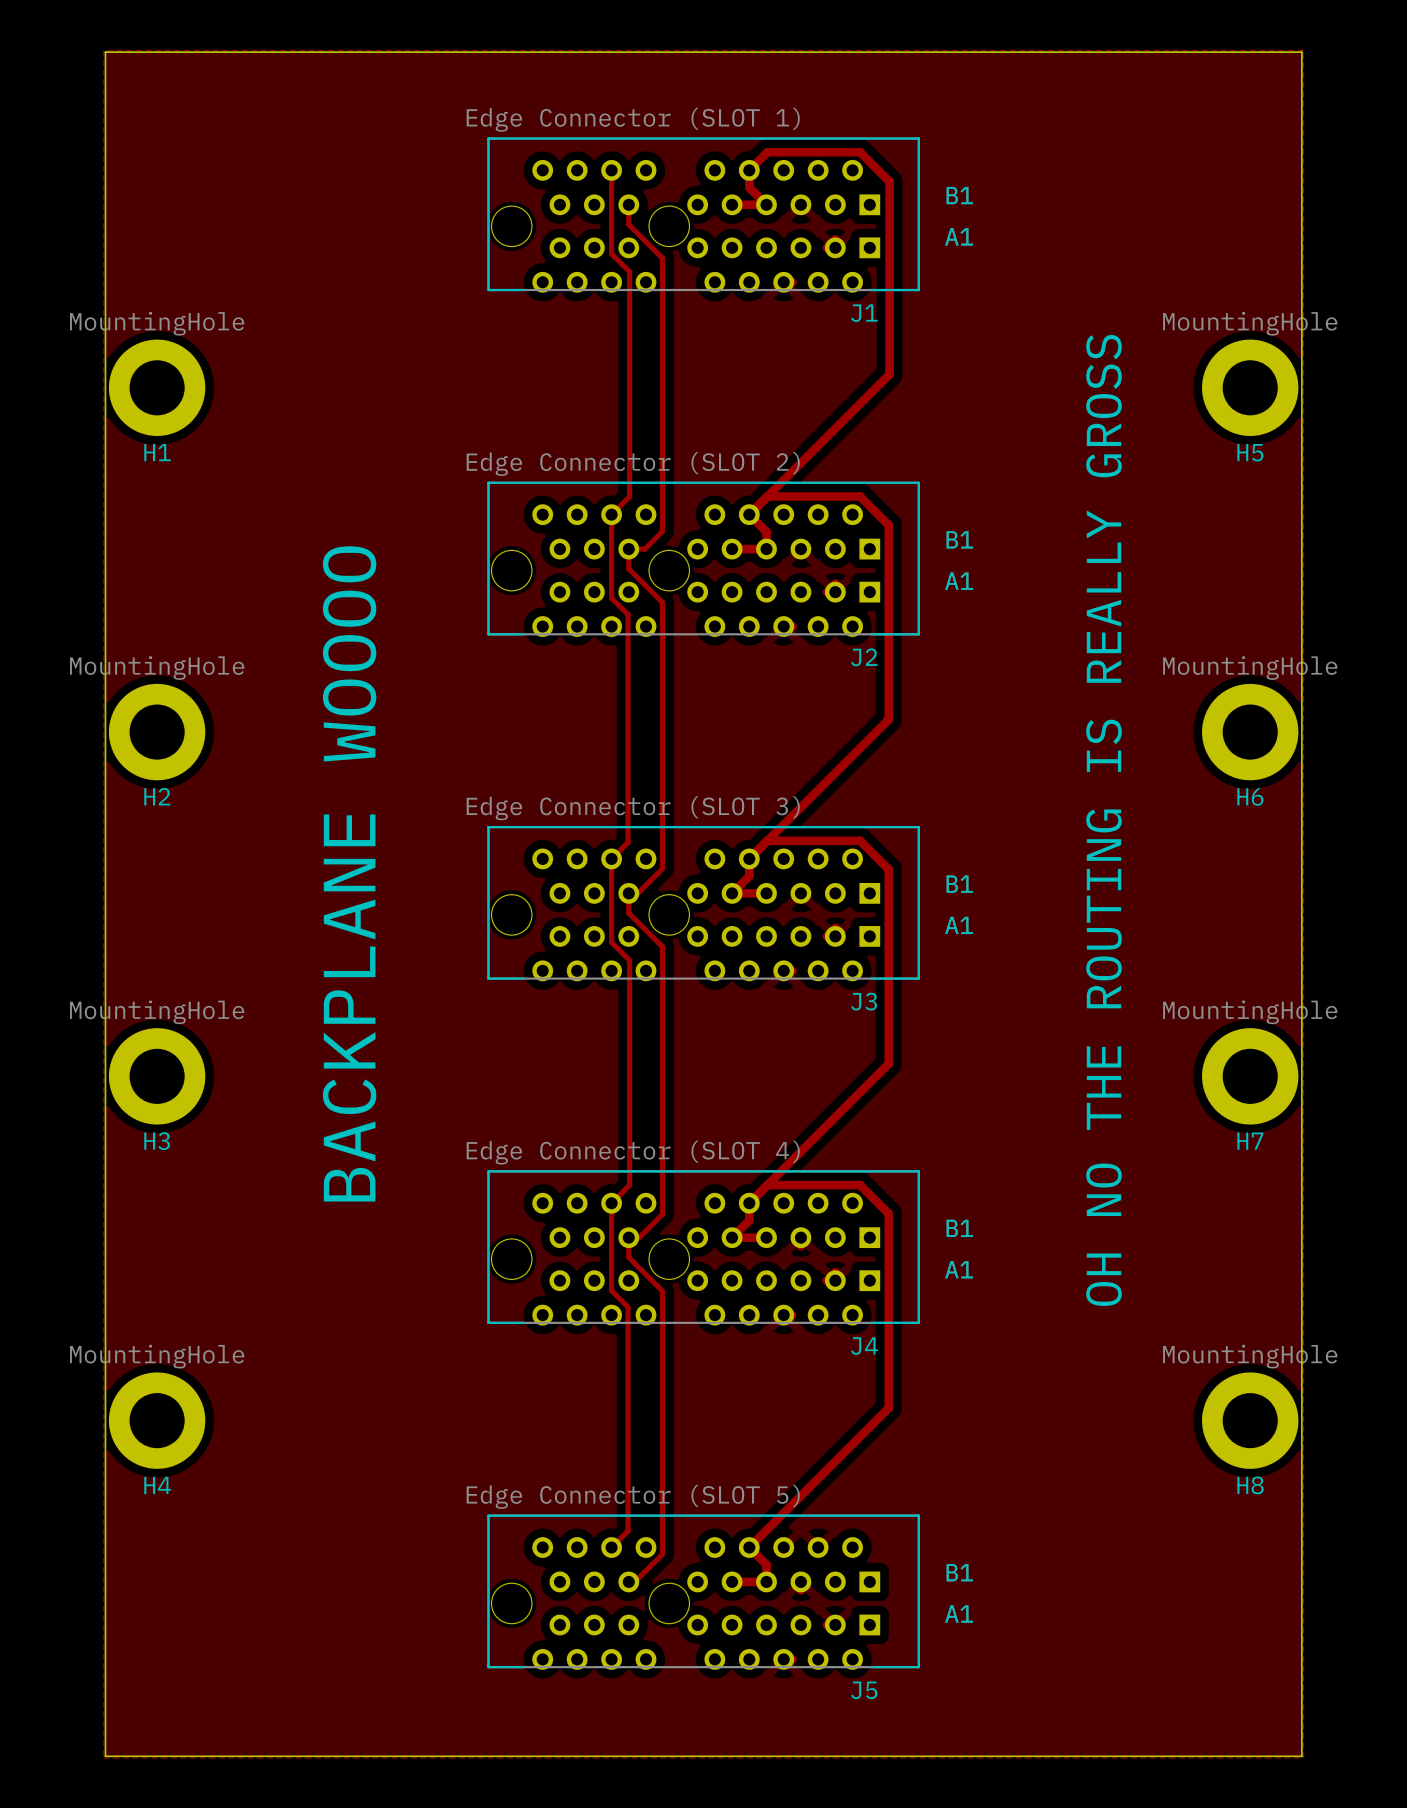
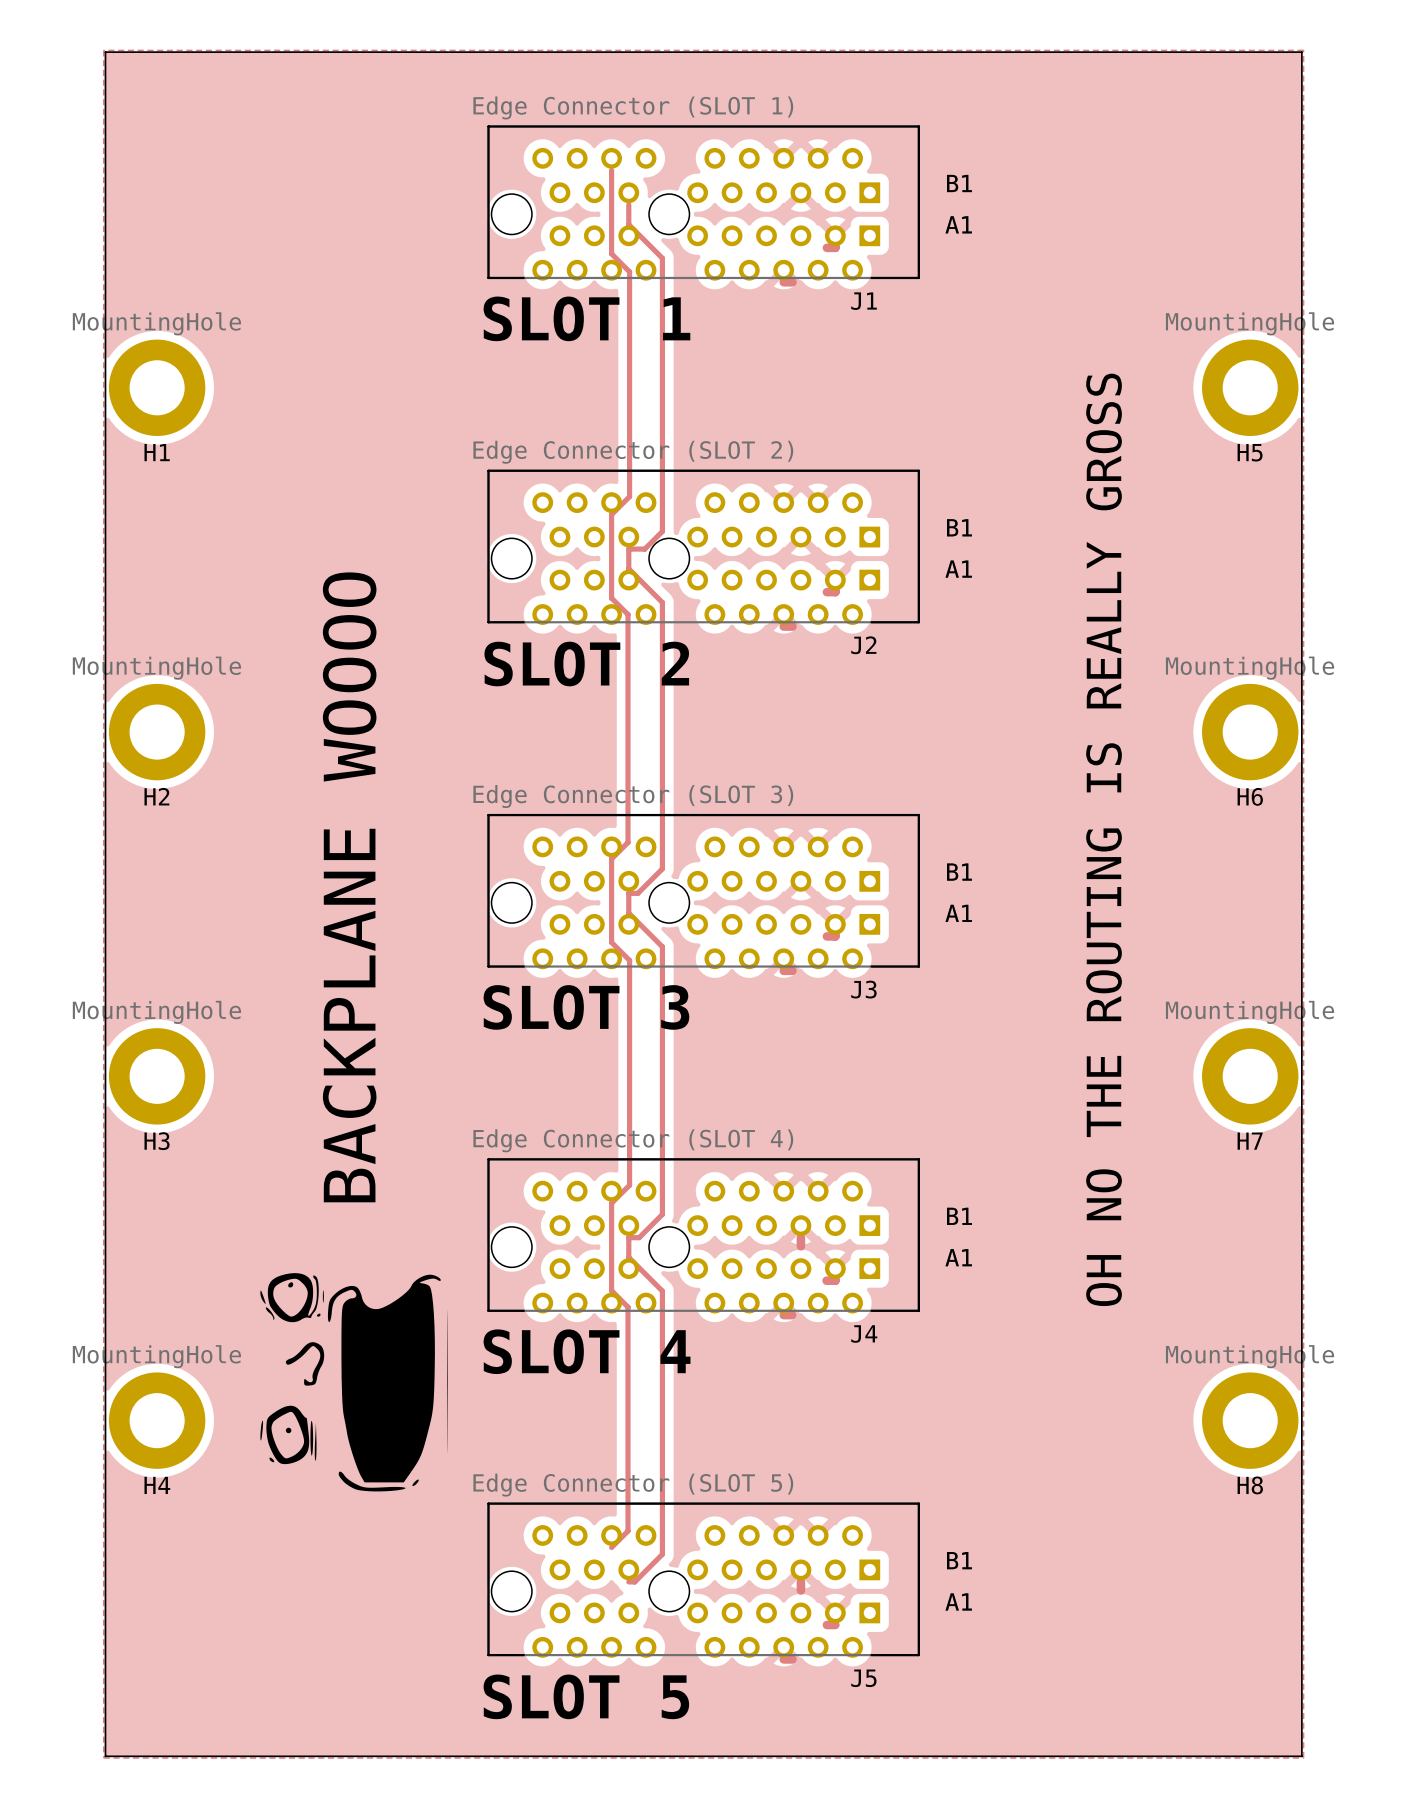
track: (732, 204) (766, 204) (749, 187) (749, 170) (767, 152) (860, 152) (889, 181) (889, 374) (749, 514) (766, 531) (766, 549) (732, 549) -> none
J1 position: (703, 215) -> (703, 203)
text: none -> SLOT 1 (586, 318)
track: (767, 496) (860, 496) (888, 525) (888, 719) (749, 858) (749, 876) (732, 893) (766, 893) -> none
J2 position: (703, 559) -> (703, 547)
text: none -> SLOT 2 (586, 664)
track: (767, 840) (860, 840) (888, 869) (888, 1063) (749, 1203) (749, 1220) (732, 1237) (766, 1237) -> none
J3 position: (703, 903) -> (703, 891)
text: none -> SLOT 3 (586, 1007)
track: (767, 1185) (860, 1185) (888, 1213) (888, 1408) (749, 1547) (766, 1564) (766, 1581) (732, 1581) -> none
J4 position: (703, 1247) -> (703, 1235)
drawing: none -> [260, 1273, 448, 1492]
text: none -> SLOT 4 (587, 1351)
J5 position: (703, 1592) -> (703, 1580)
text: none -> SLOT 5 (586, 1696)

